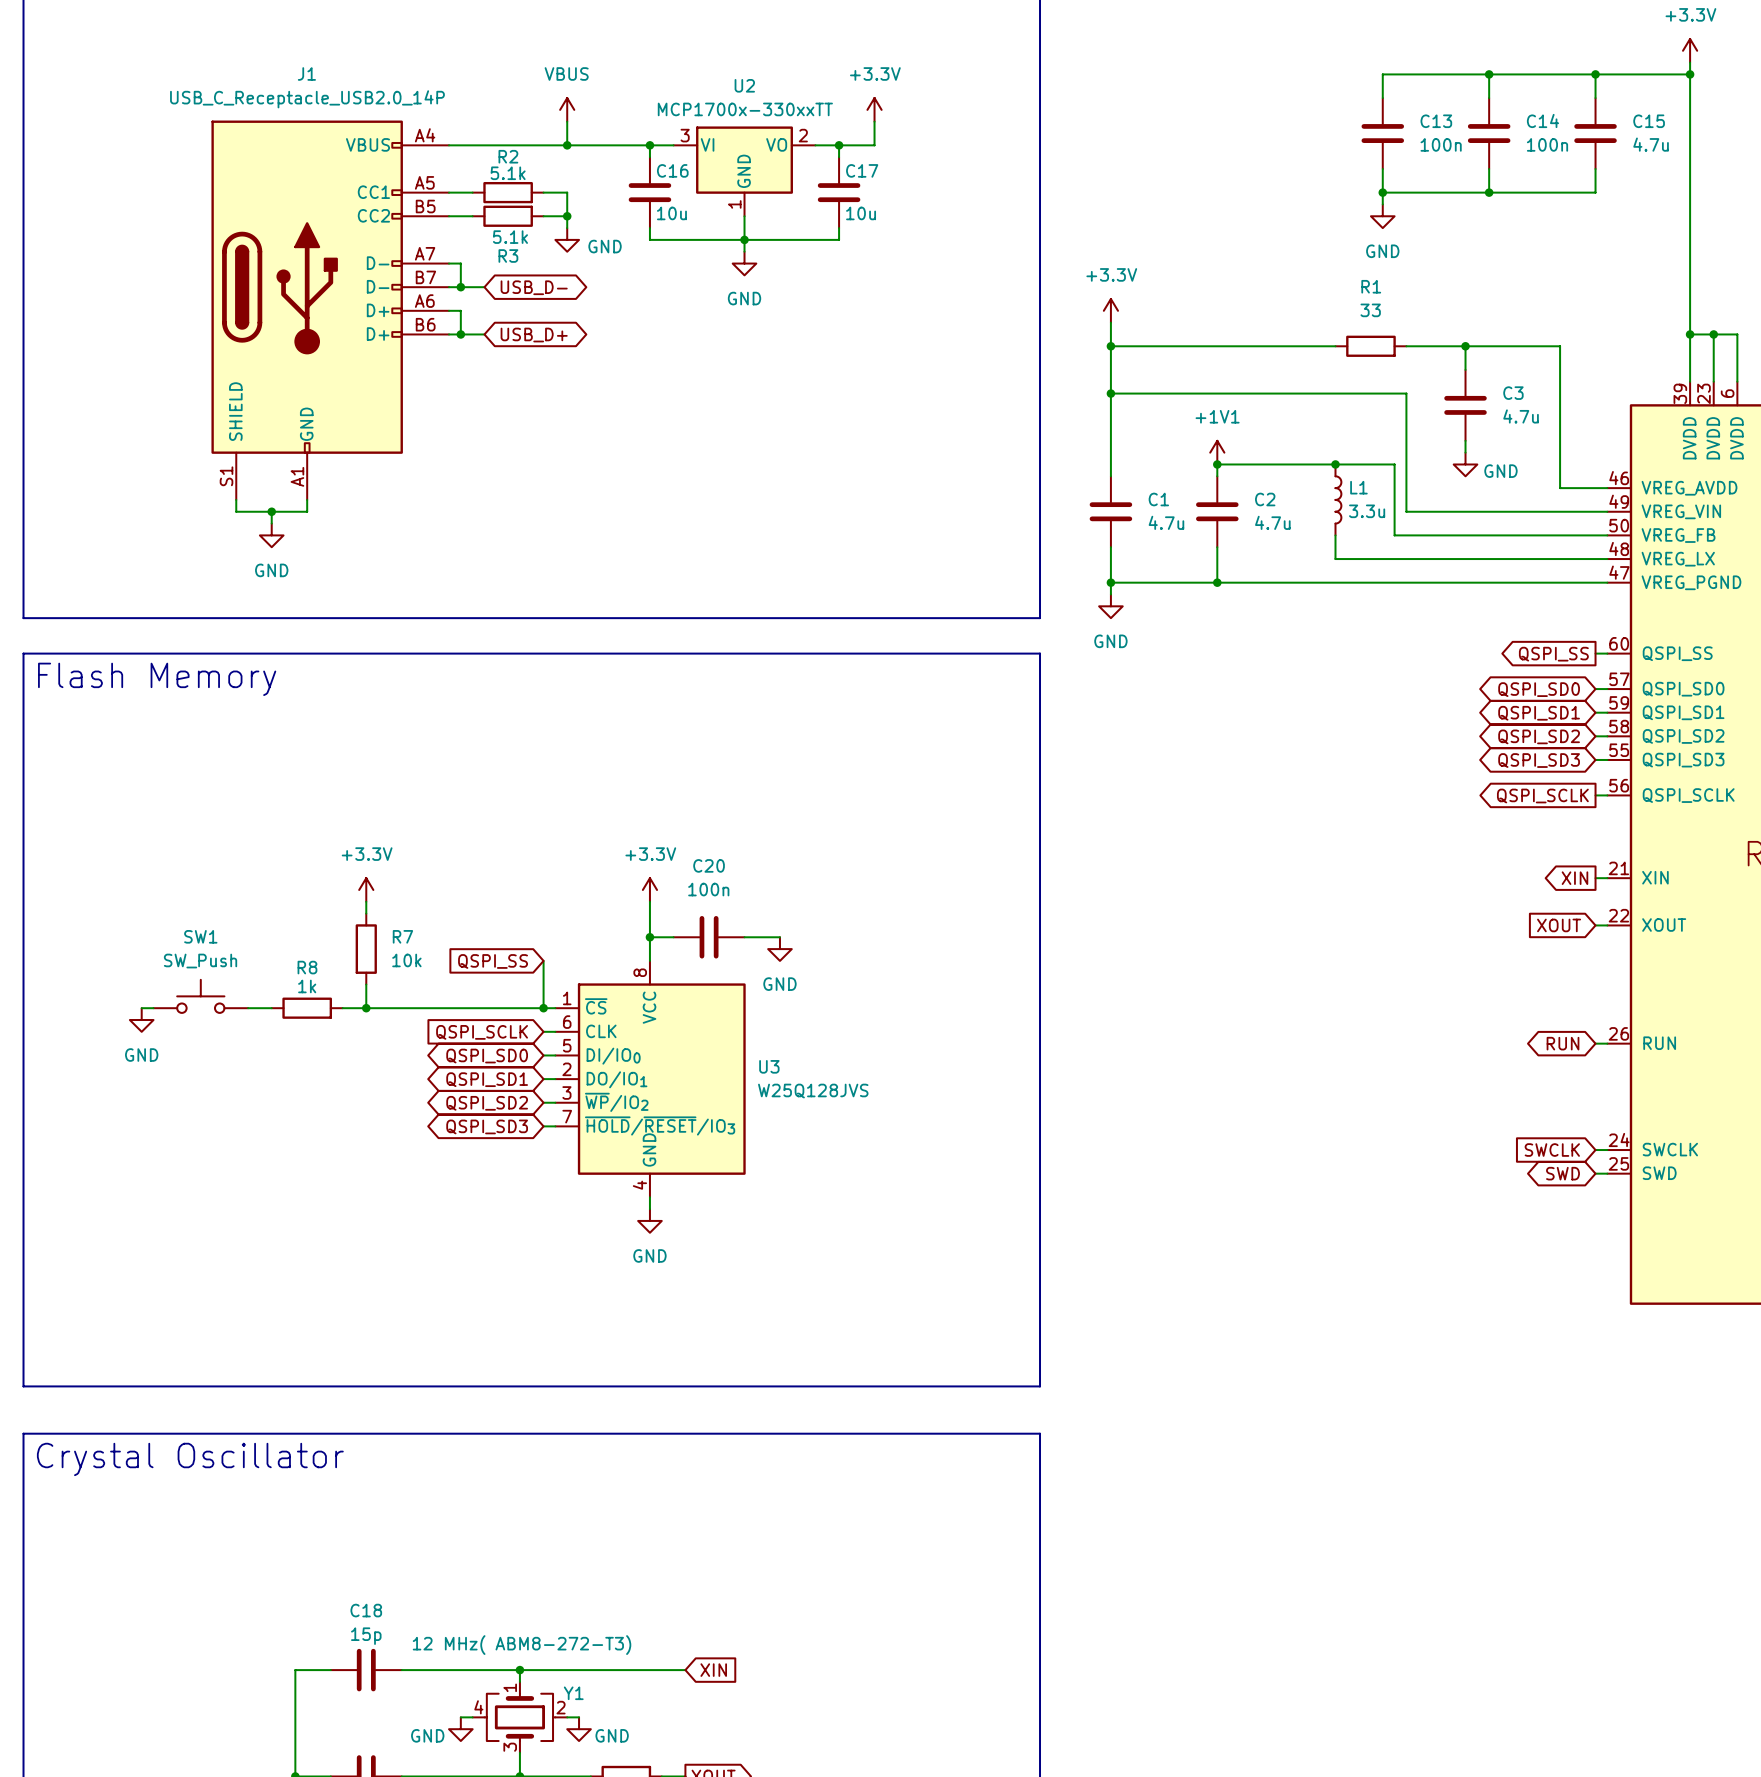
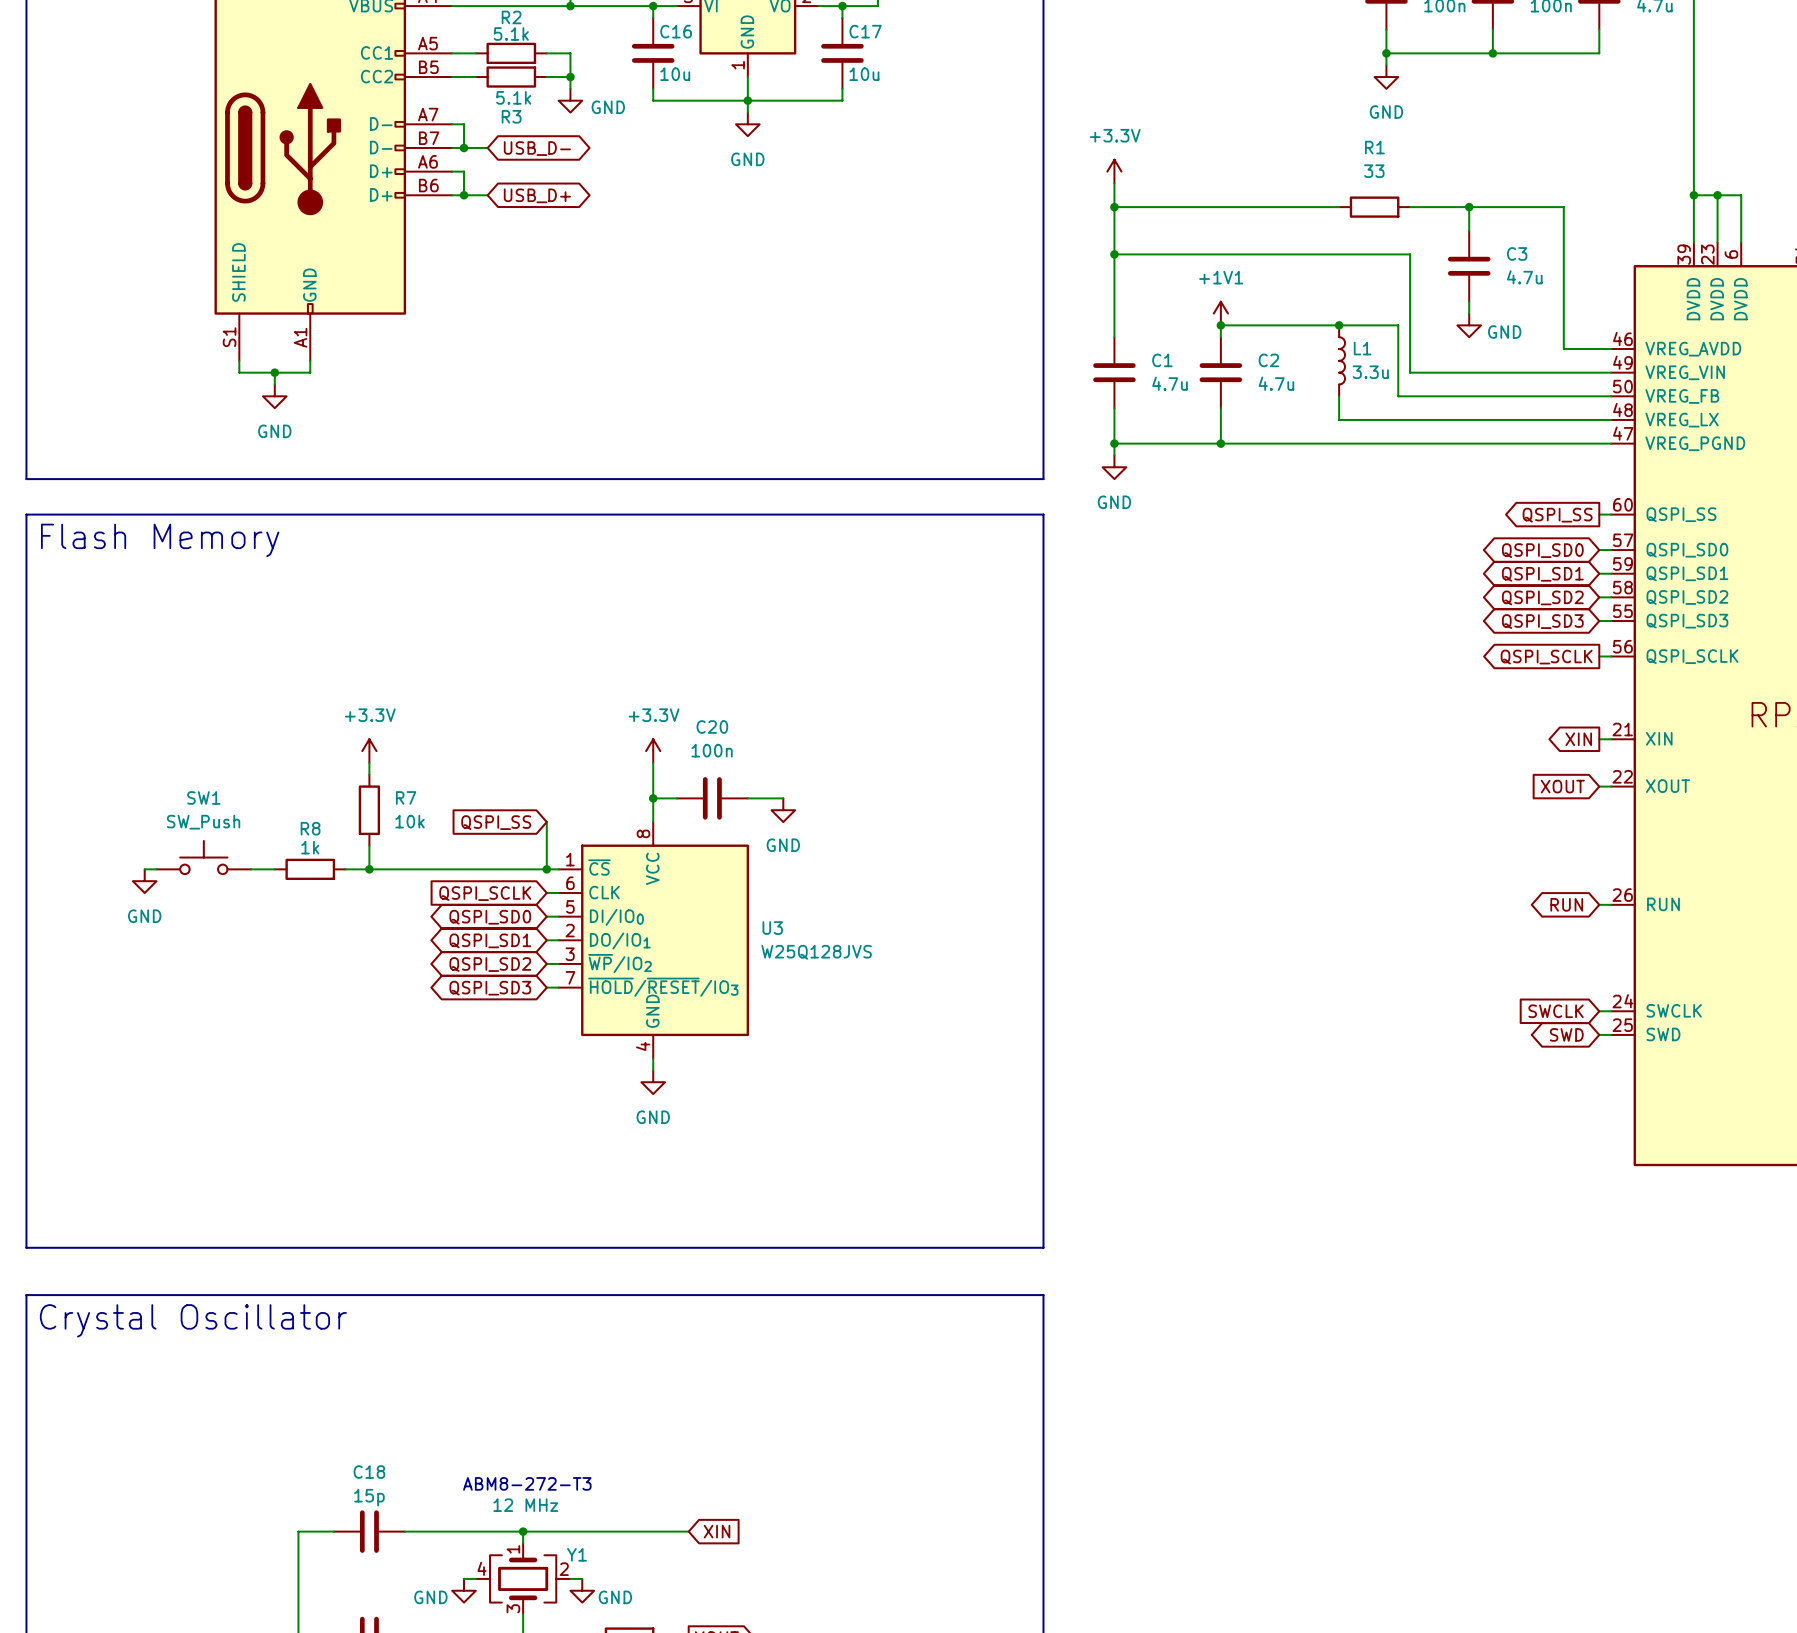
text: none -> ABM8-272-T3 (527, 1483)
Y1 value: 12 MHz( ABM8-272-T3) (522, 1645) -> 12 MHz (525, 1505)

